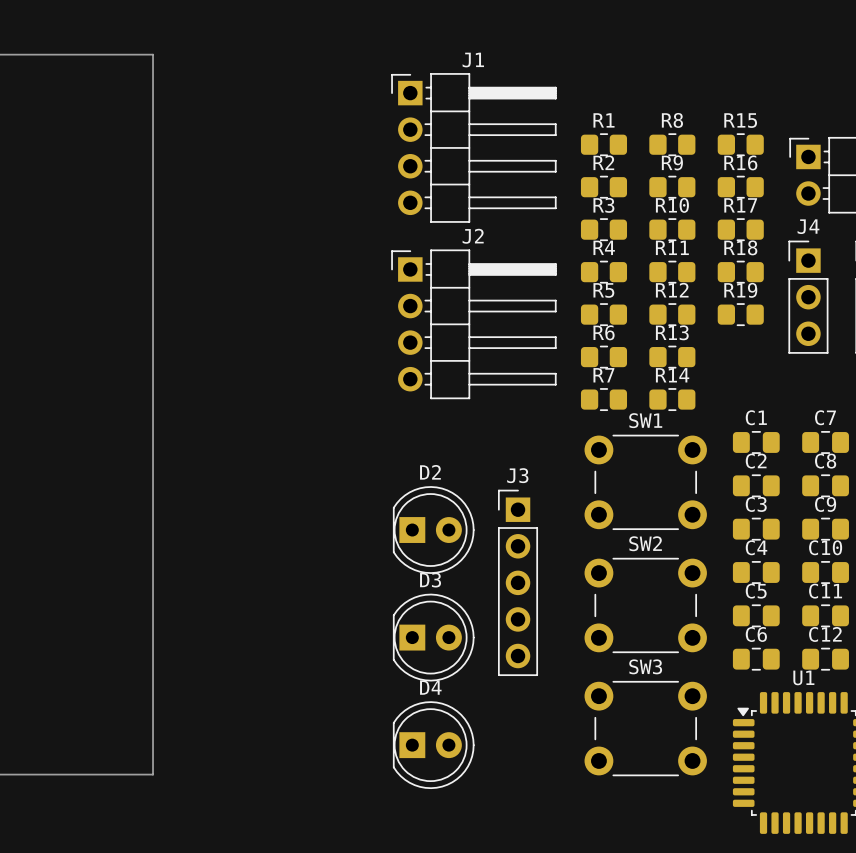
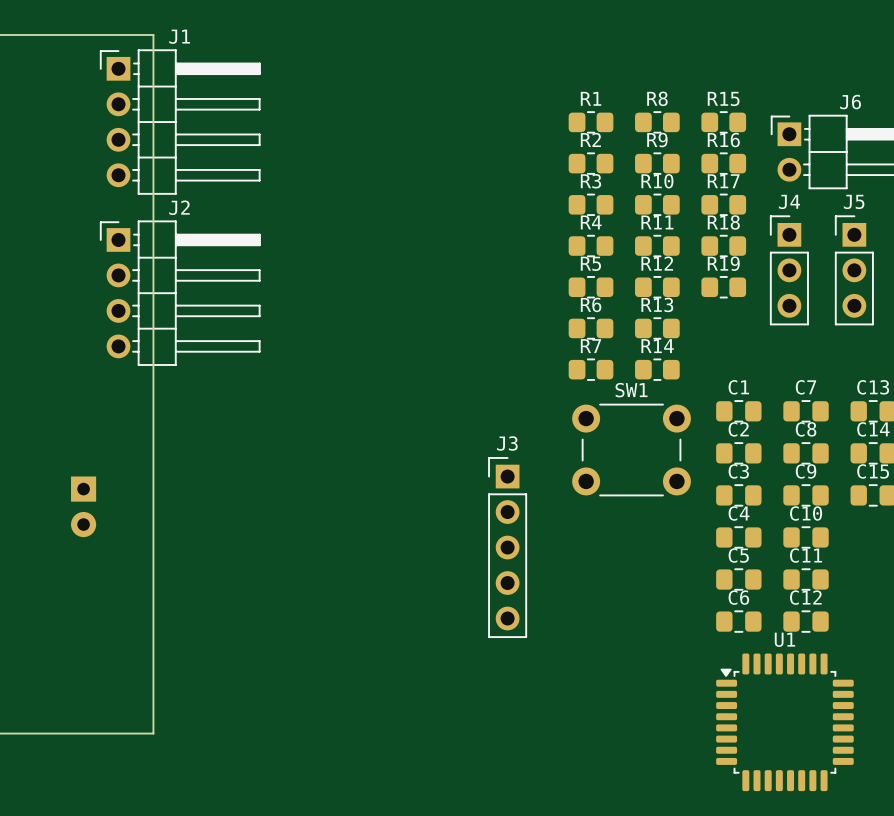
J1 position: (473, 147) -> (180, 122)
J2 position: (473, 324) -> (180, 293)
D2: (433, 530) -> none
part: none -> (83, 506)
SW2: (645, 605) -> none
D3: (433, 637) -> none
SW3: (645, 728) -> none
D4: (433, 745) -> none

